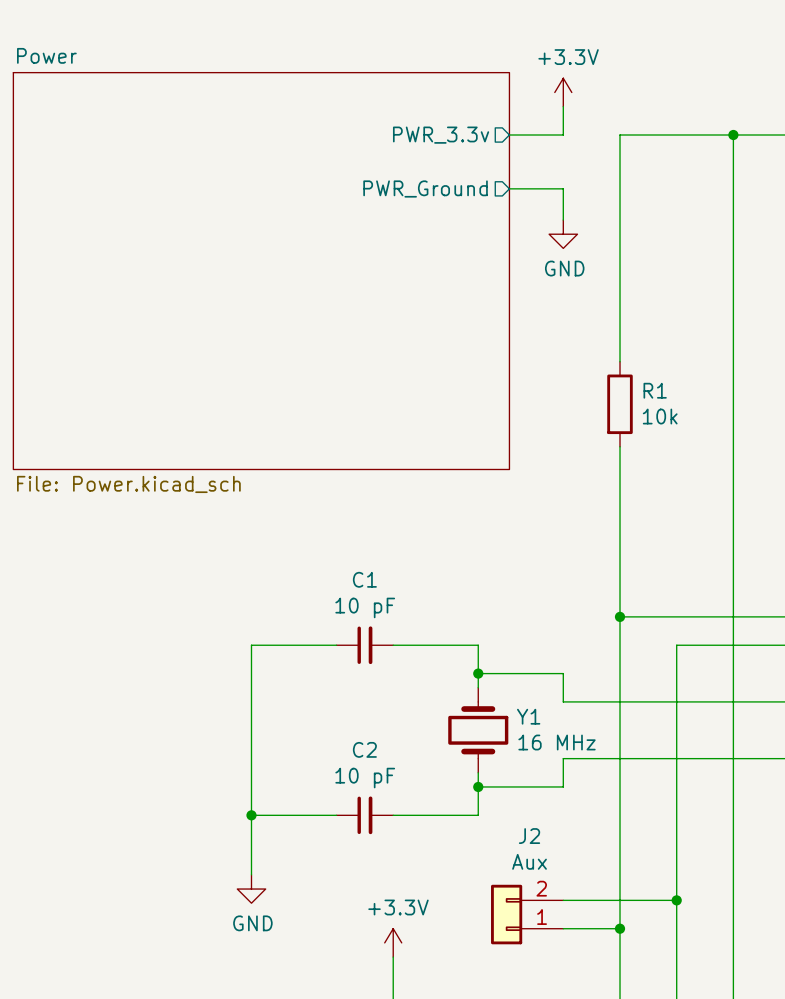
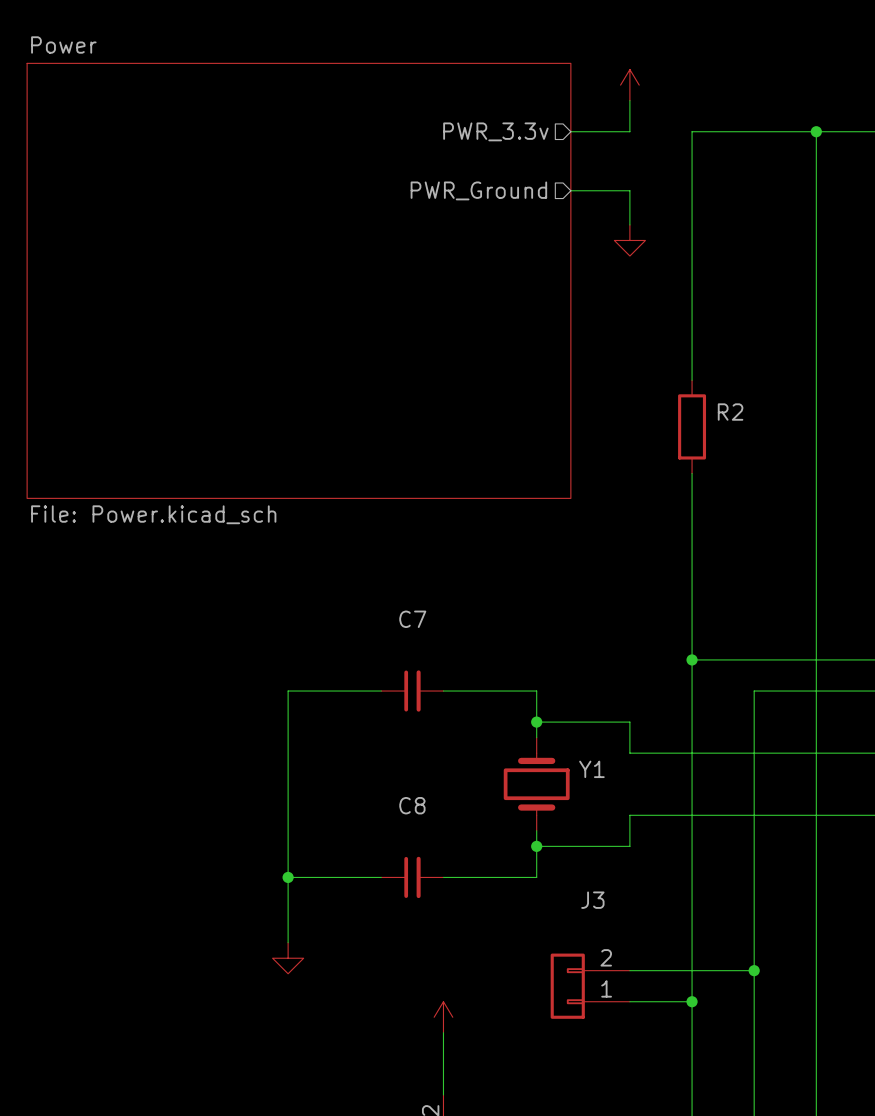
power symbol text: +3.3V (568, 57) -> none
power symbol text: GND (564, 268) -> none
R1 name: R1 (655, 390) -> R2 (730, 412)
R1 value: 10k (660, 416) -> none
C1 name: C1 (364, 579) -> C7 (412, 619)
C1 value: 10 pF (365, 607) -> none
Y1 value: 16 MHz (557, 742) -> none
C2 name: C2 (364, 749) -> C8 (412, 805)
C2 value: 10 pF (365, 778) -> none
J2 name: J2 (529, 836) -> J3 (592, 900)
J2 value: Aux (529, 861) -> none
power symbol text: +3.3V (398, 907) -> none
power symbol text: GND (252, 923) -> none

